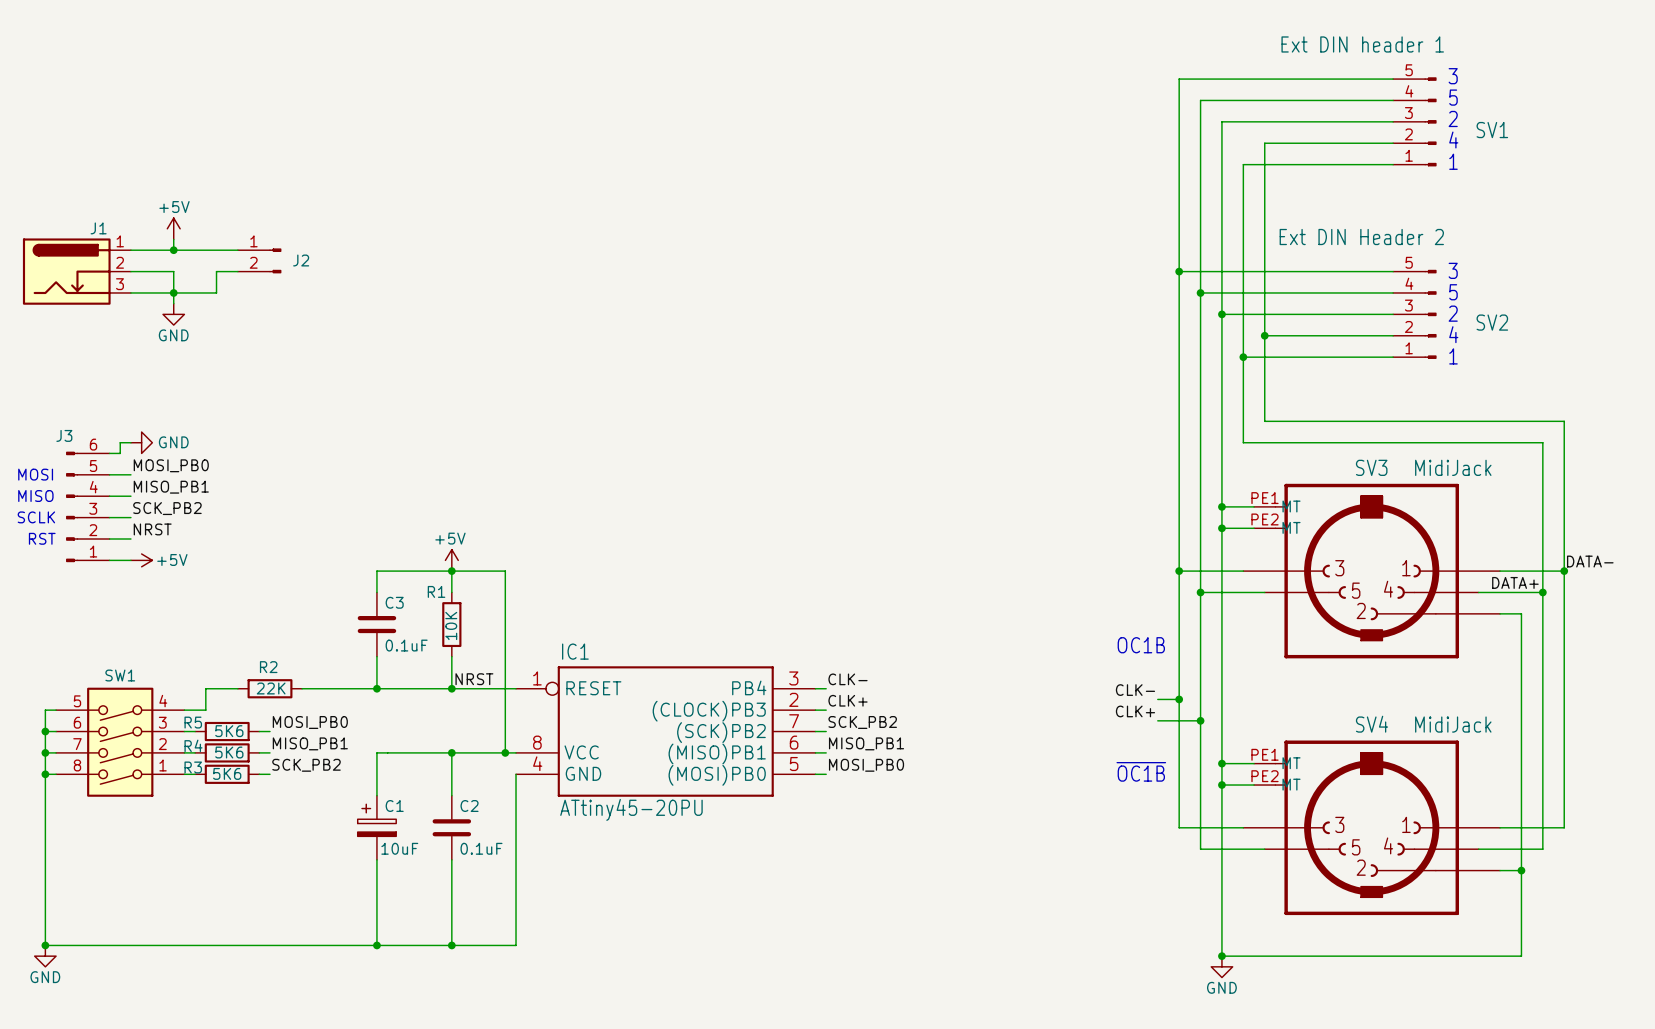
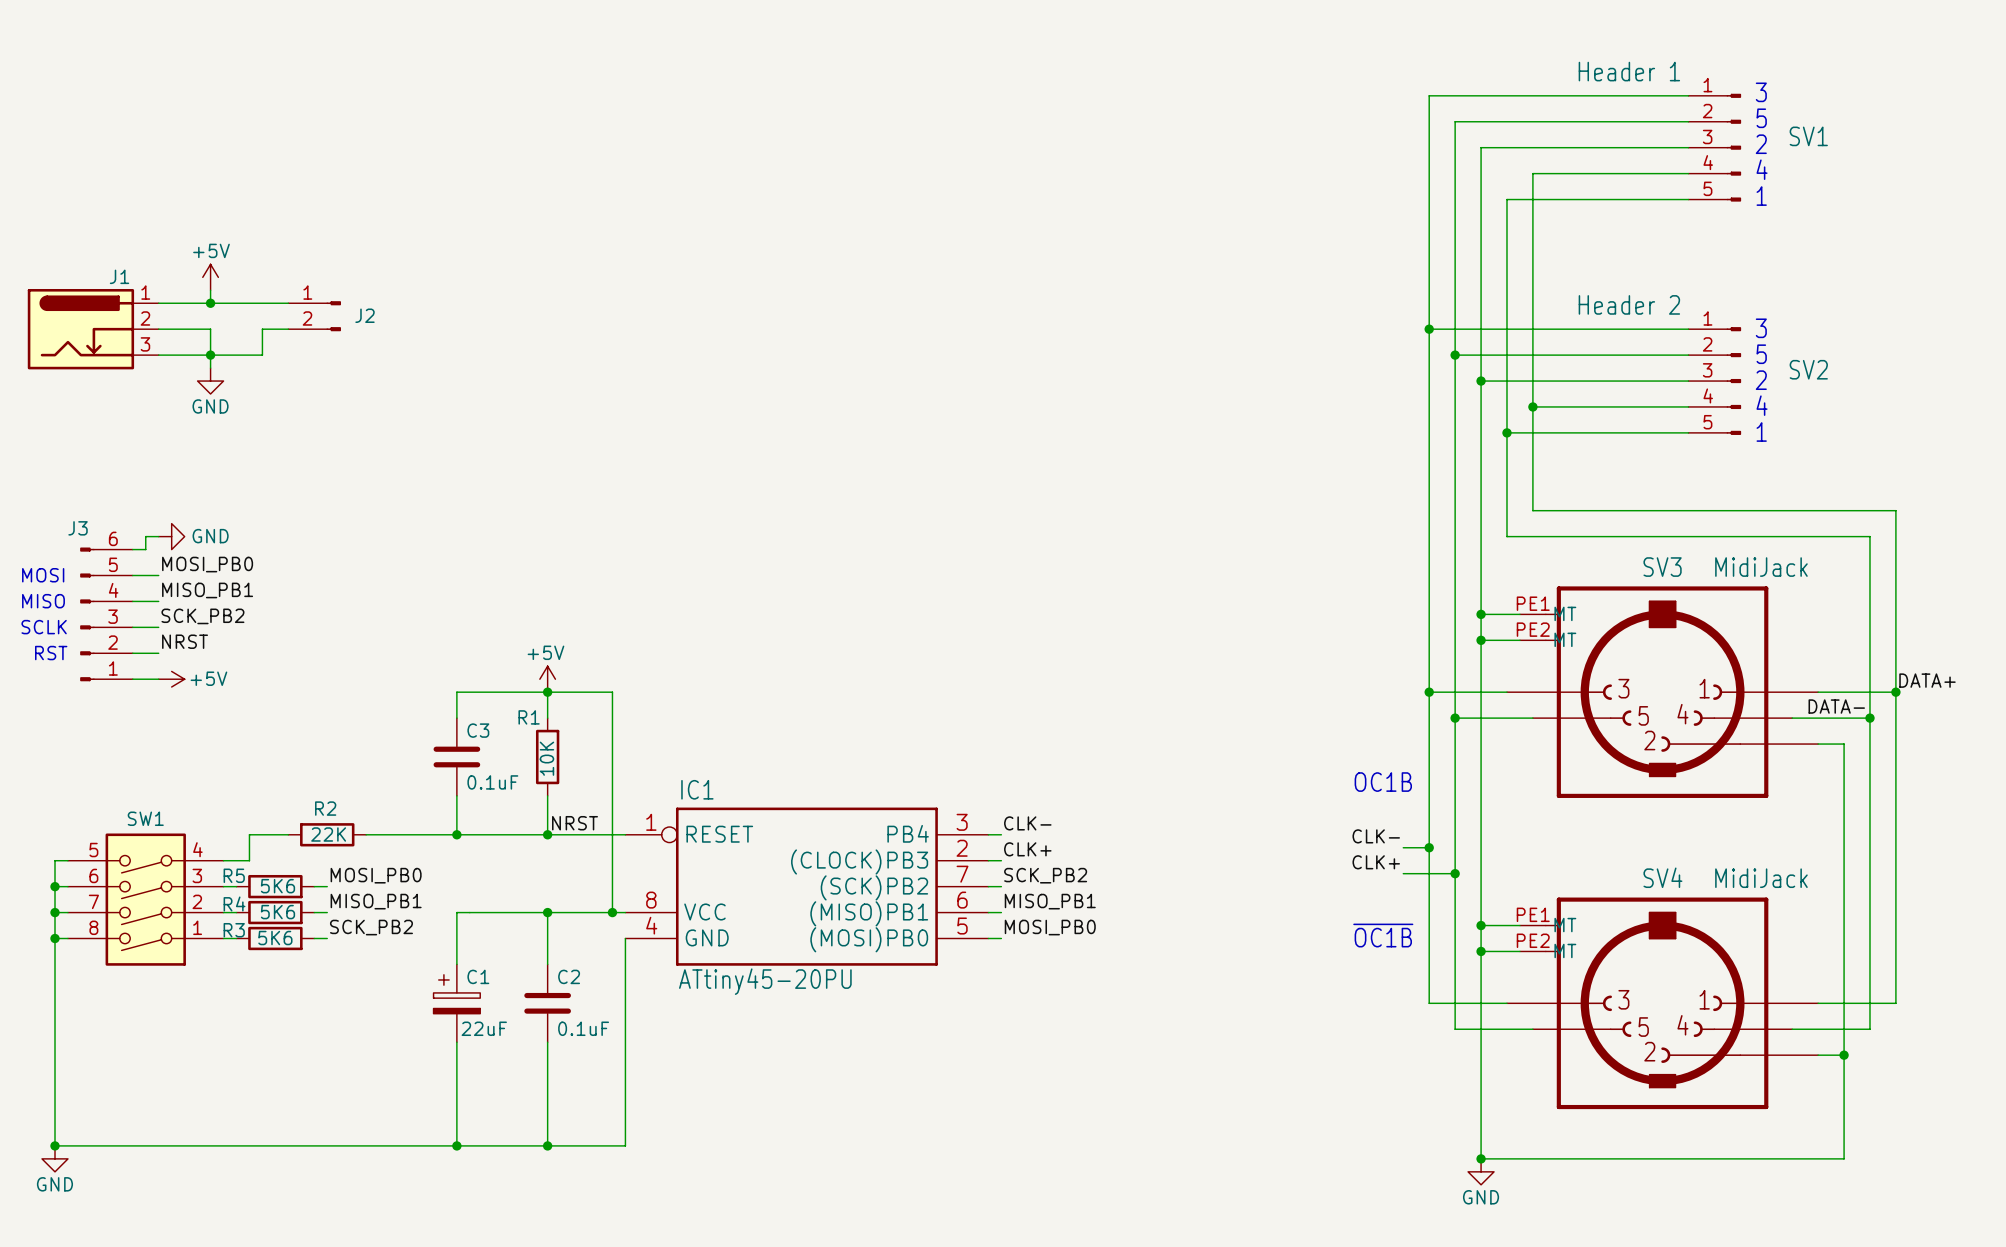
SV1 value: Ext DIN header 1 (1362, 44) -> Header 1 (1629, 71)
SV1 flip: as is (1430, 121) -> up-down (1733, 147)
SV2 value: Ext DIN Header 2 (1361, 237) -> Header 2 (1629, 304)
SV2 flip: as is (1430, 314) -> up-down (1733, 381)
label: DATA- (1590, 561) -> DATA+ (1927, 680)
label: DATA+ (1515, 582) -> DATA- (1836, 706)
C1 value: 10uF (399, 848) -> 22uF (484, 1028)

